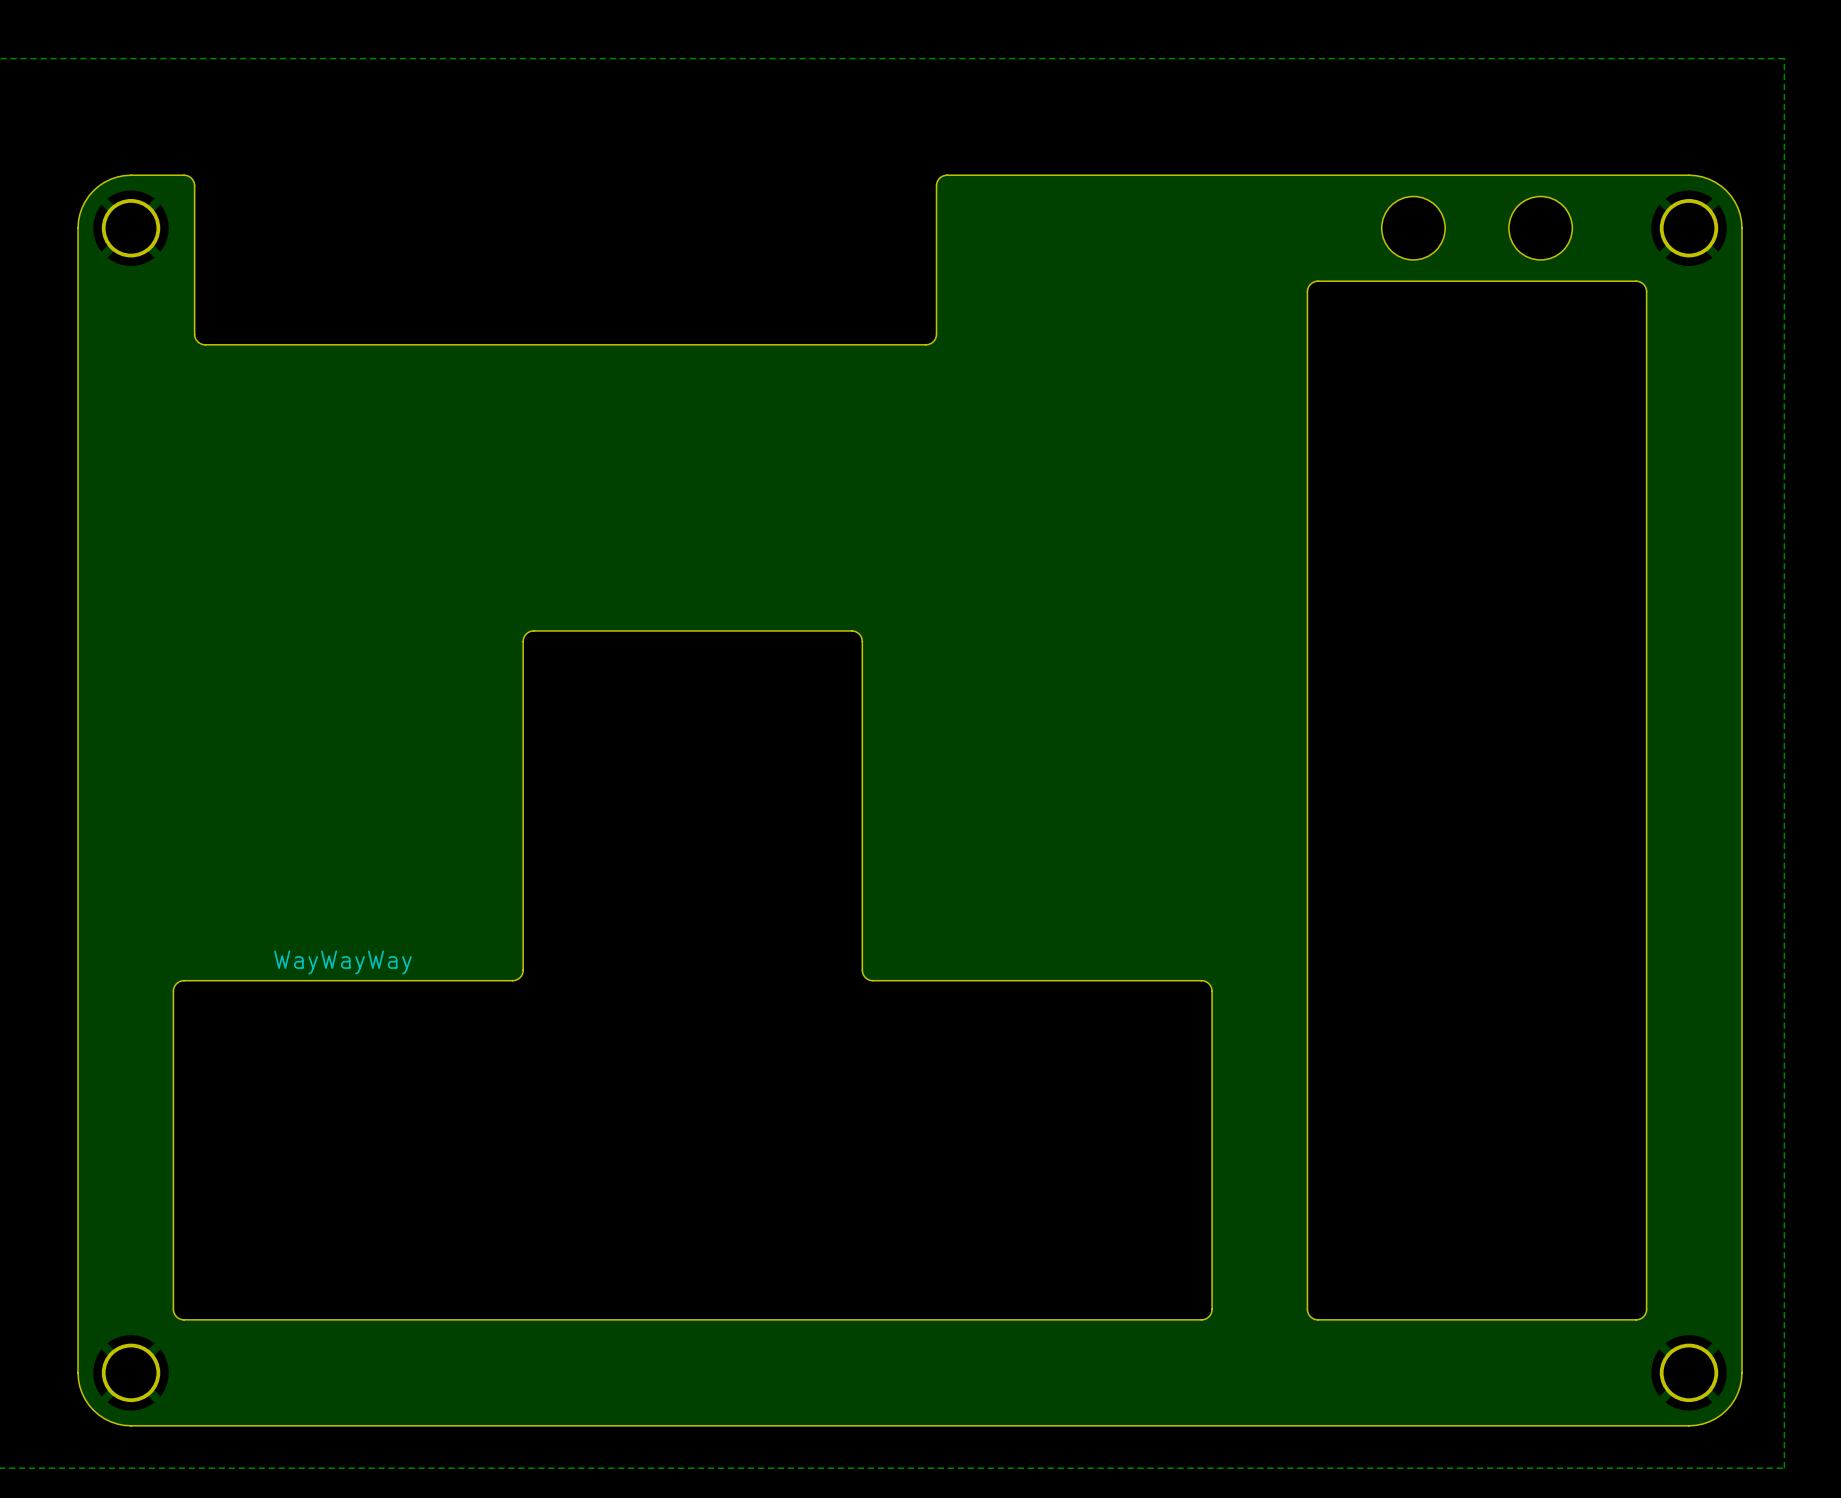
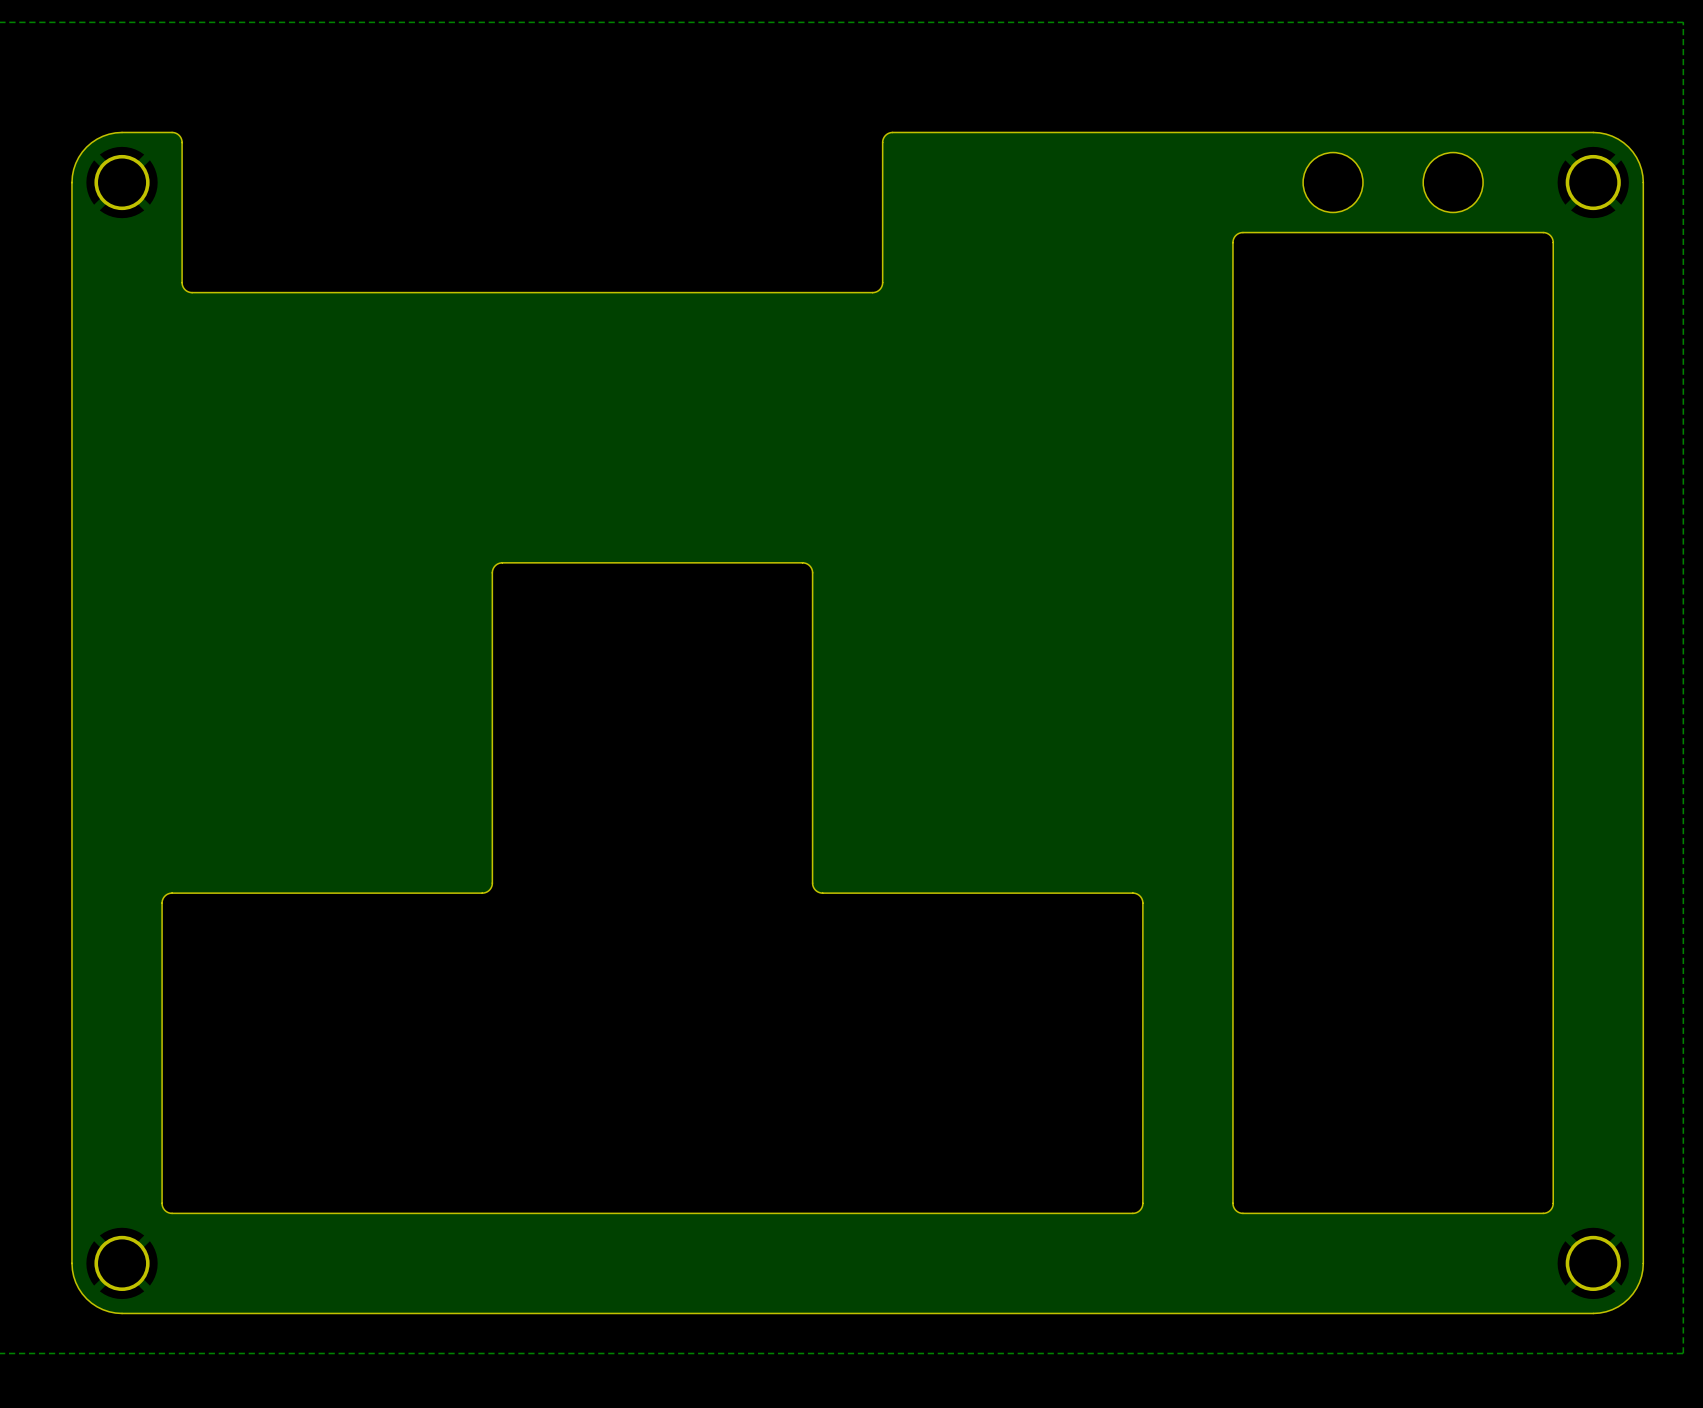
text: WayWayWay (342, 962) -> none

